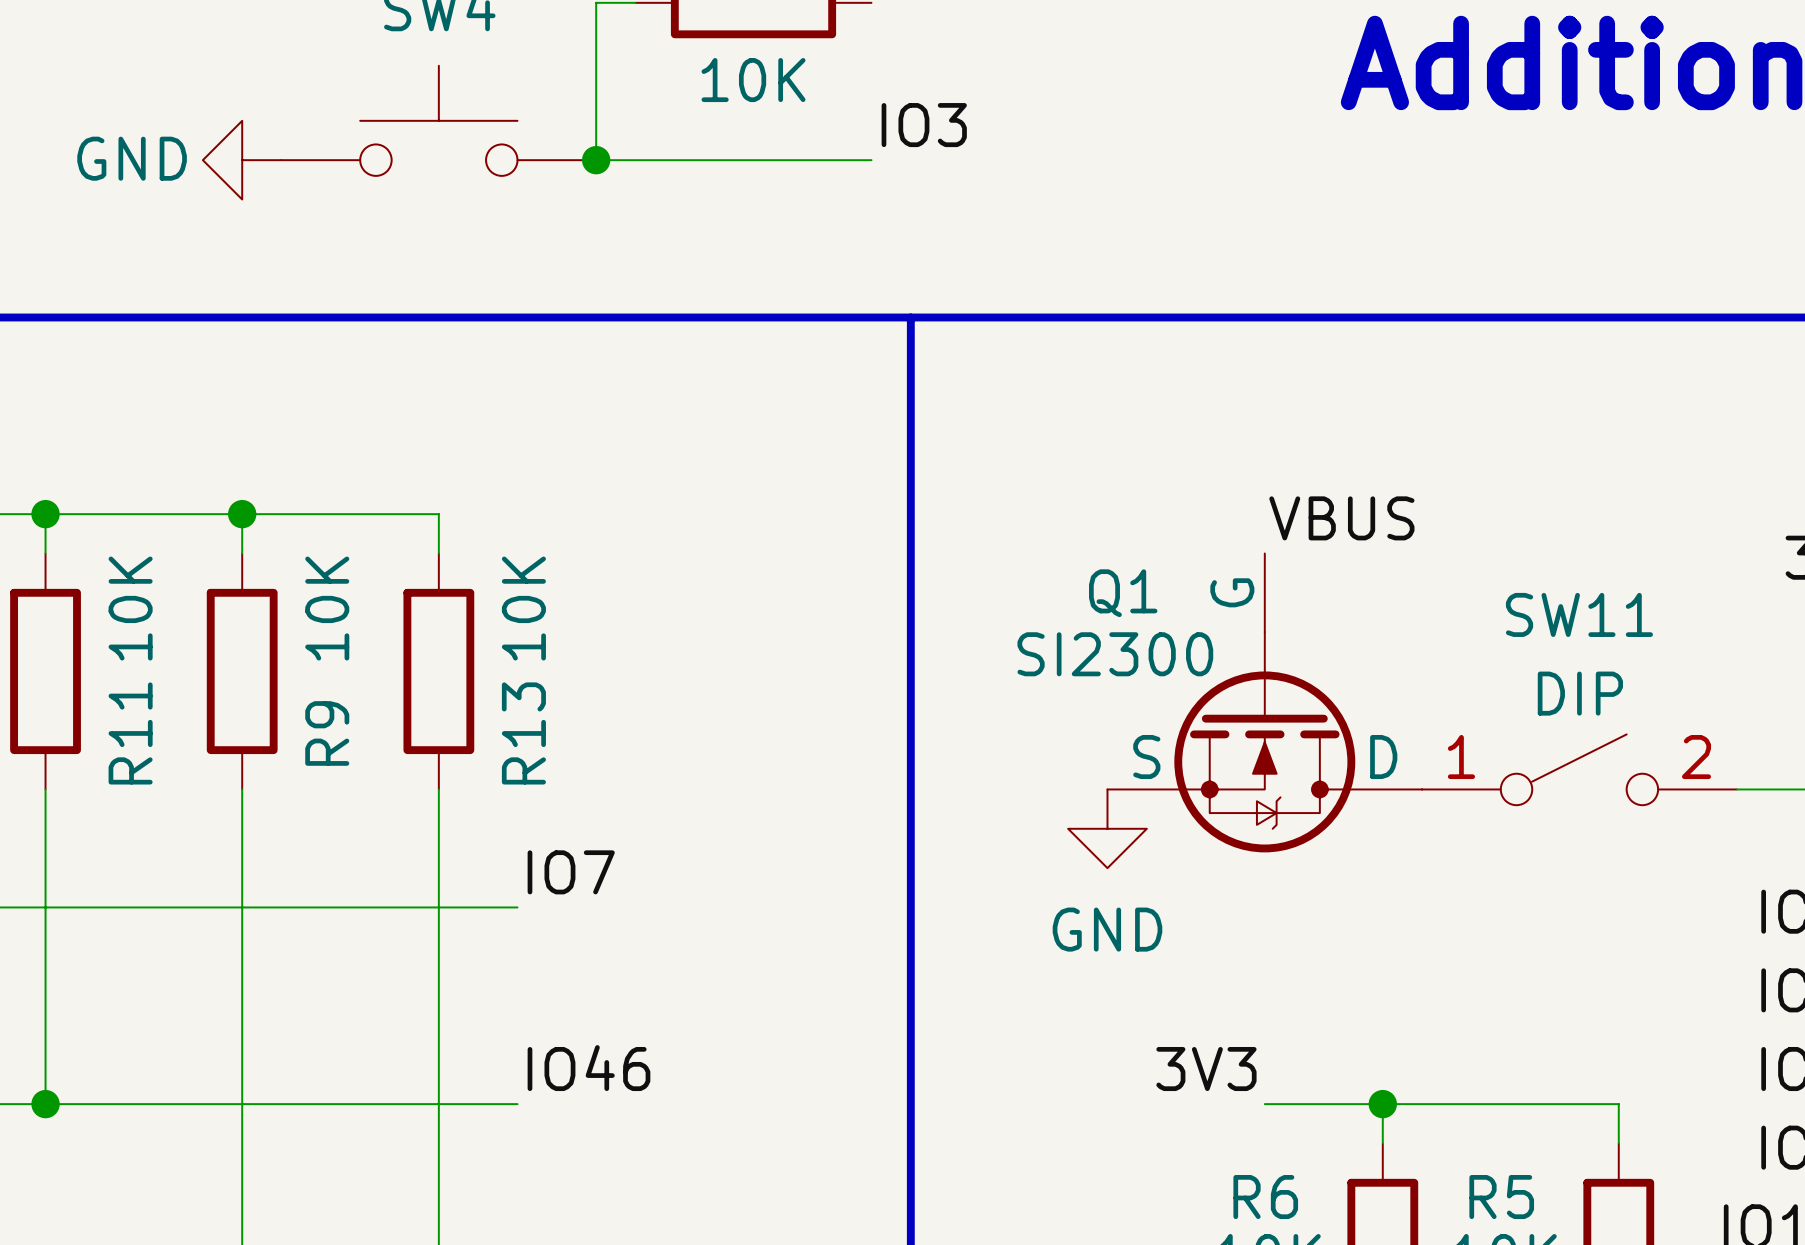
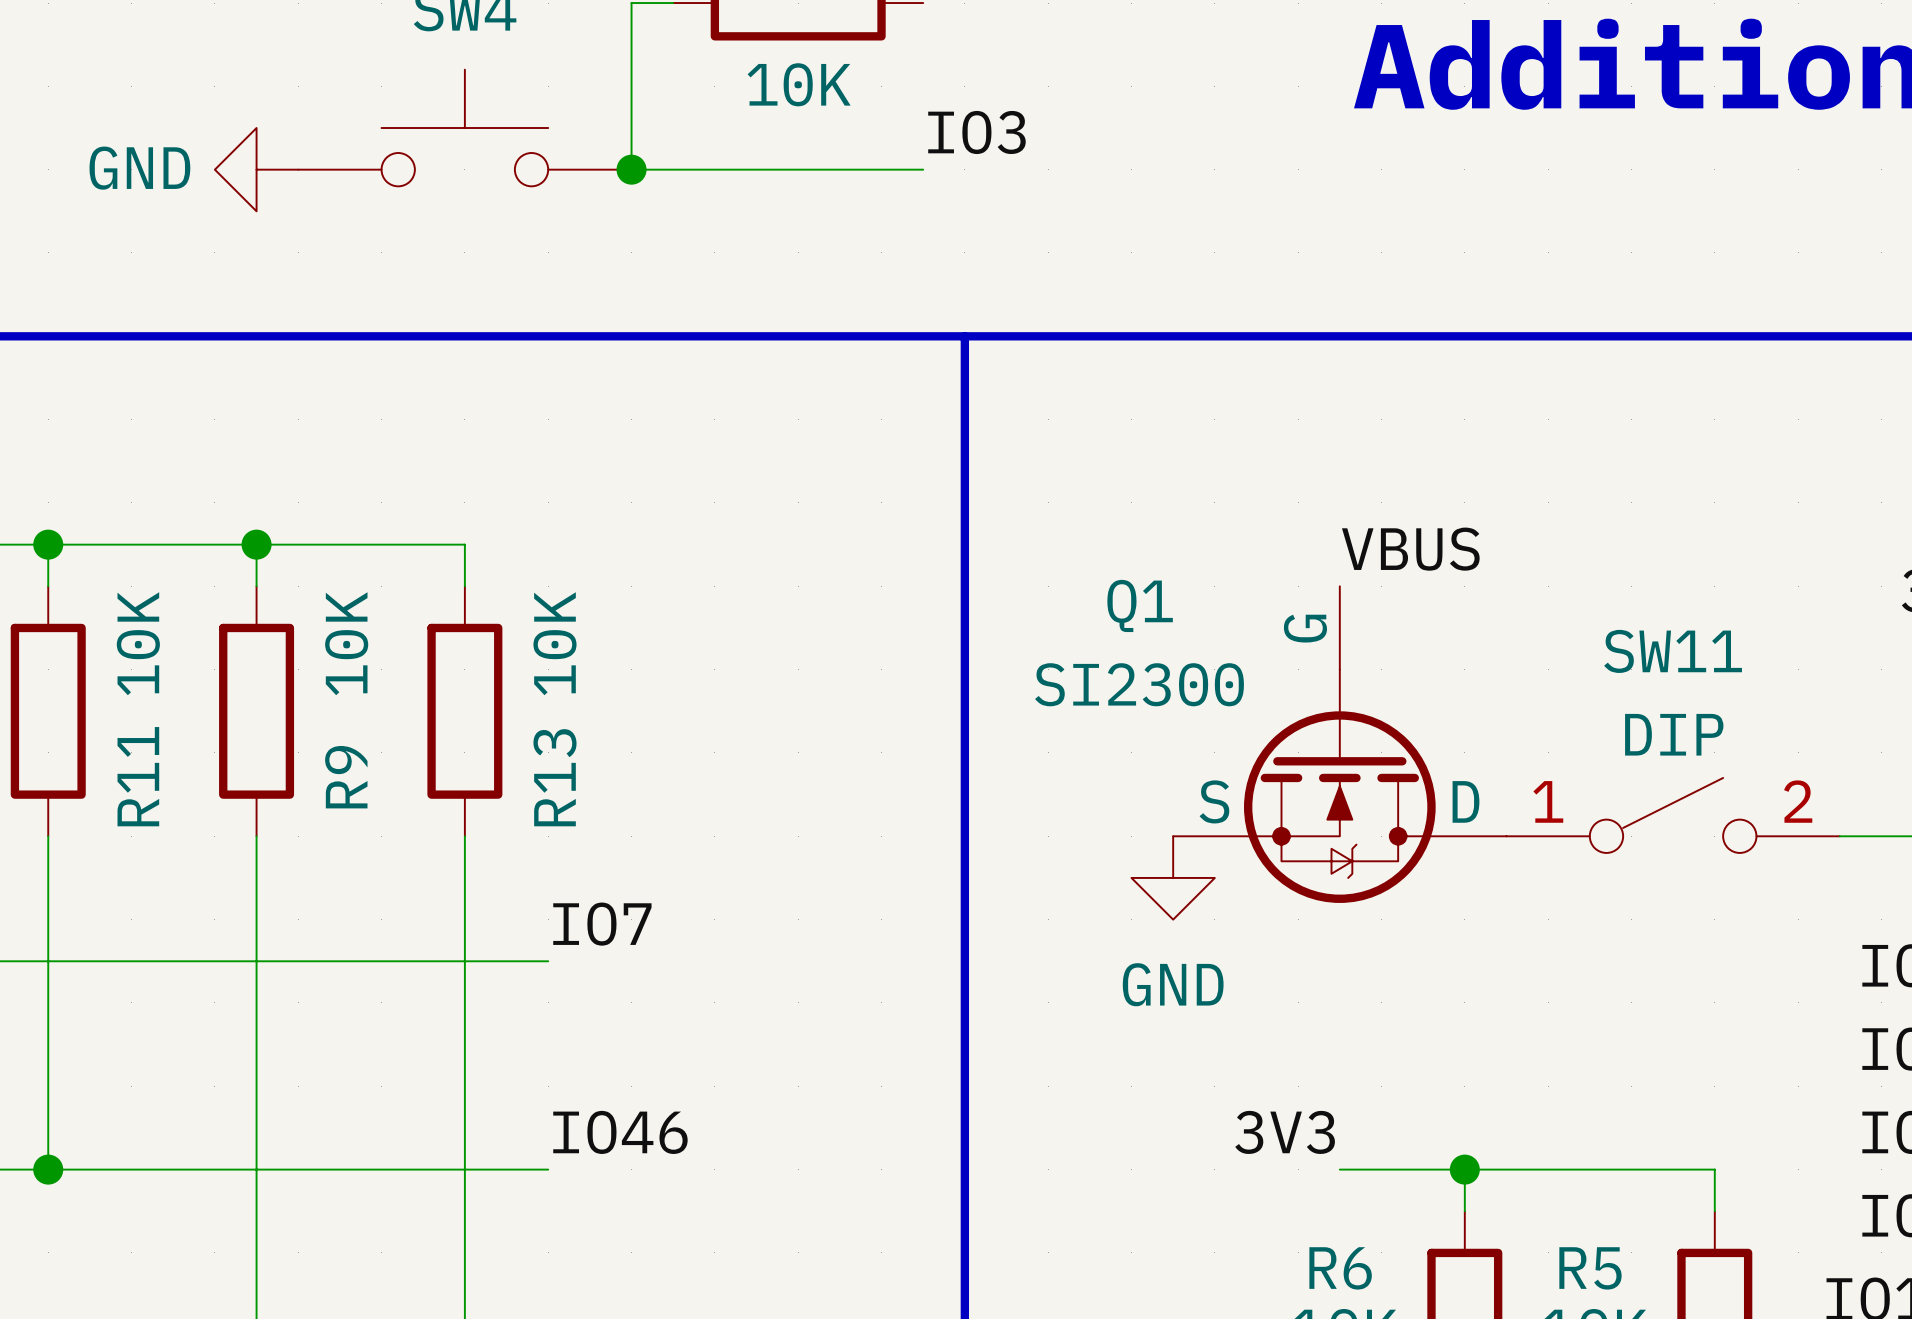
Q1 name position: Q1 (1123, 593) -> Q1 (1140, 605)
Q1 value position: SI2300 (1115, 654) -> SI2300 (1139, 684)

